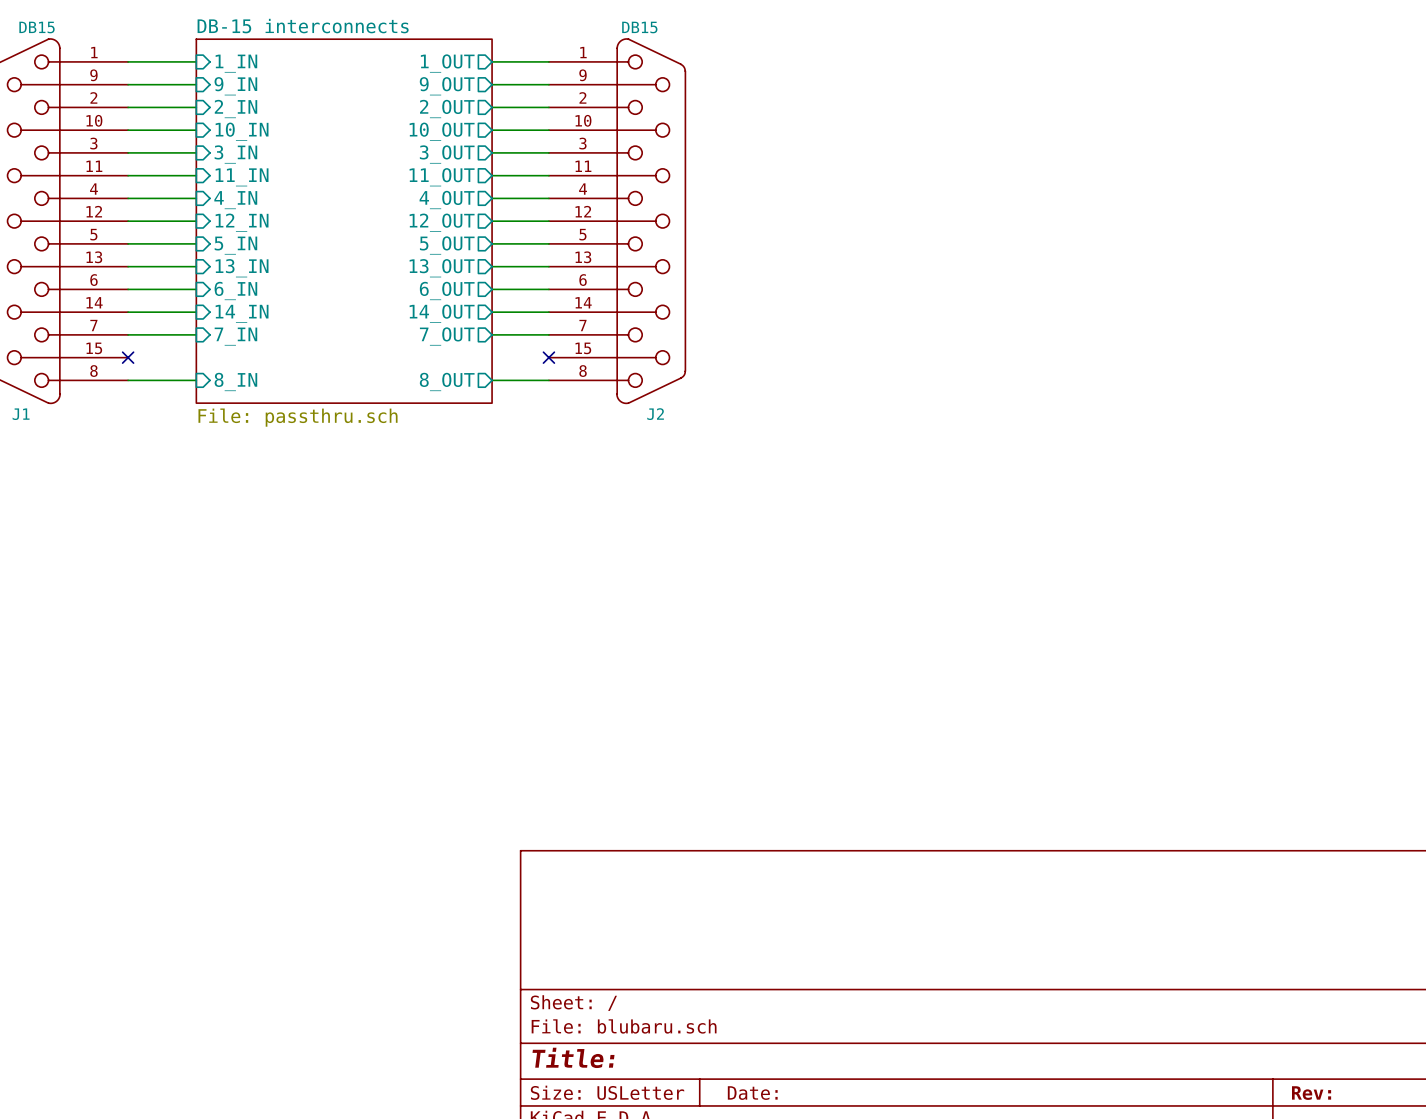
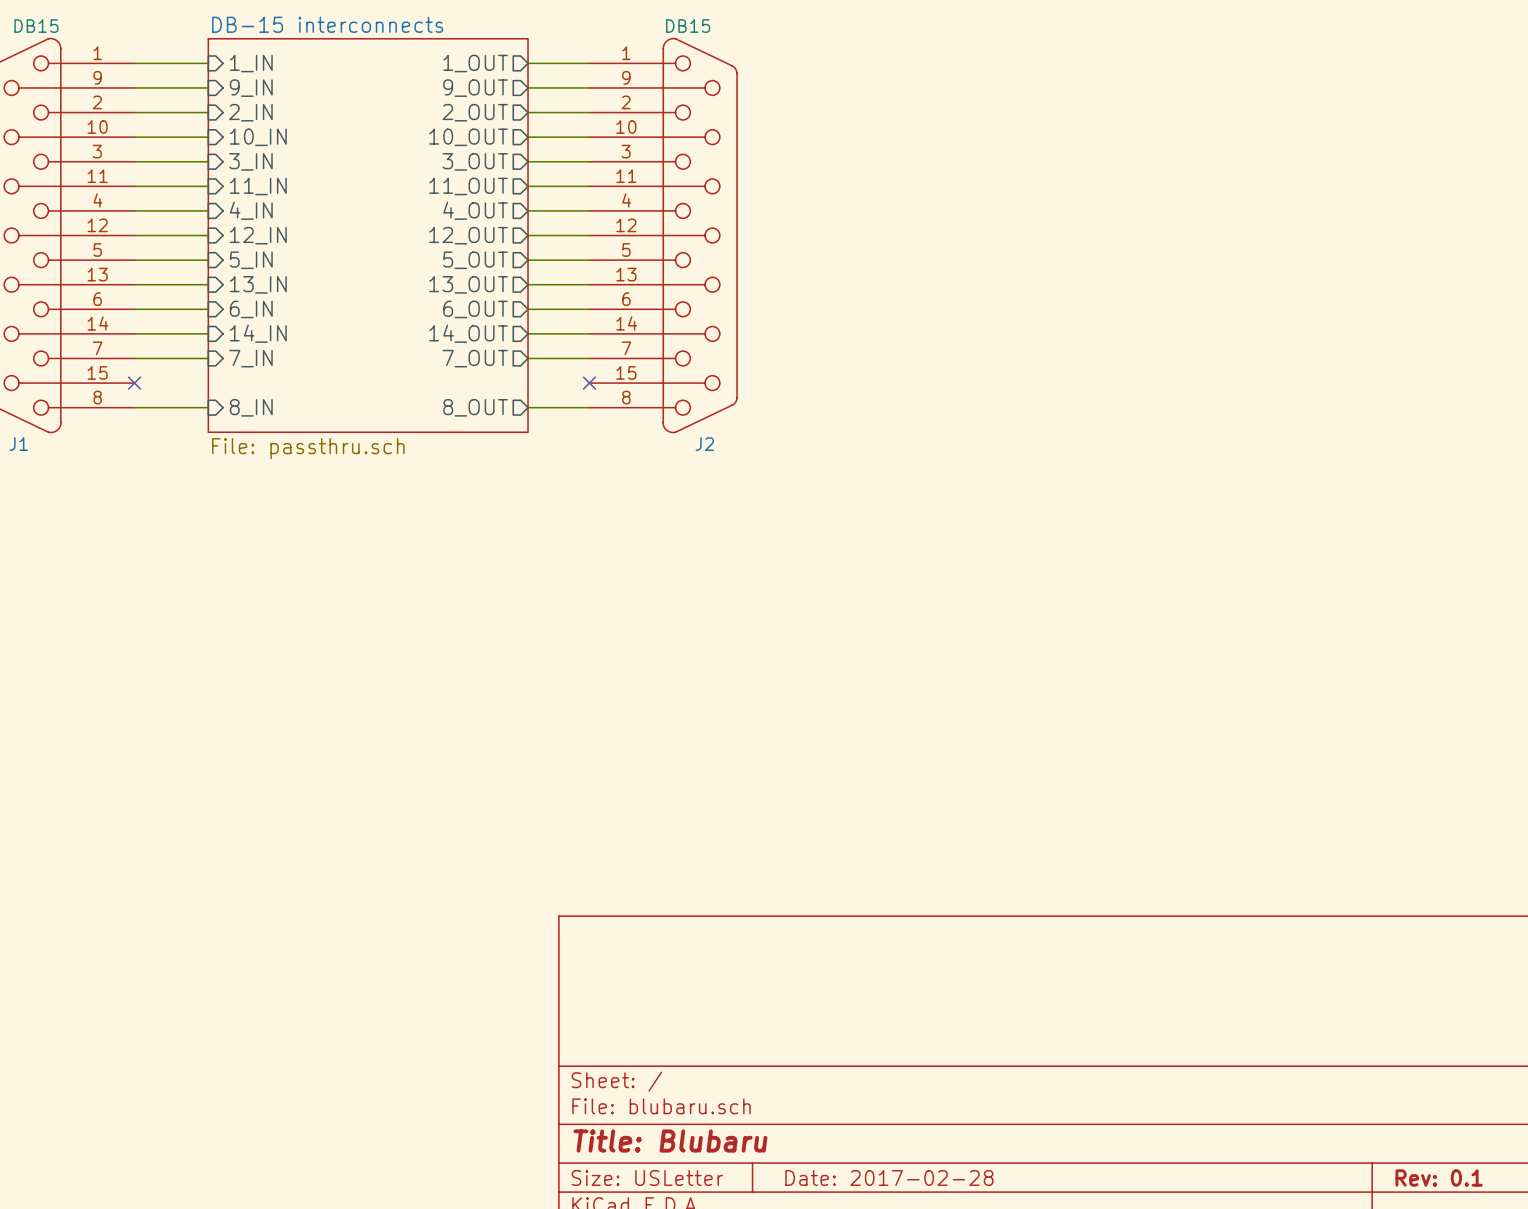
title block: Title: (573, 1057) -> Title: Blubaru (670, 1141)
title block: Date: (752, 1093) -> Date: 2017-02-28 (889, 1177)
title block: Rev: (1311, 1093) -> Rev: 0.1 (1439, 1177)

